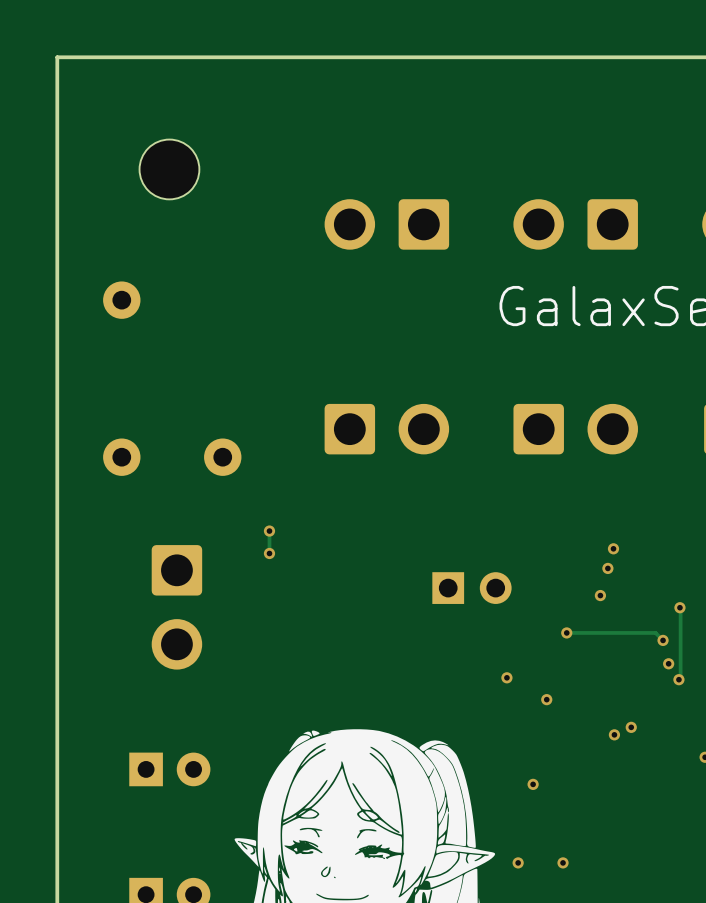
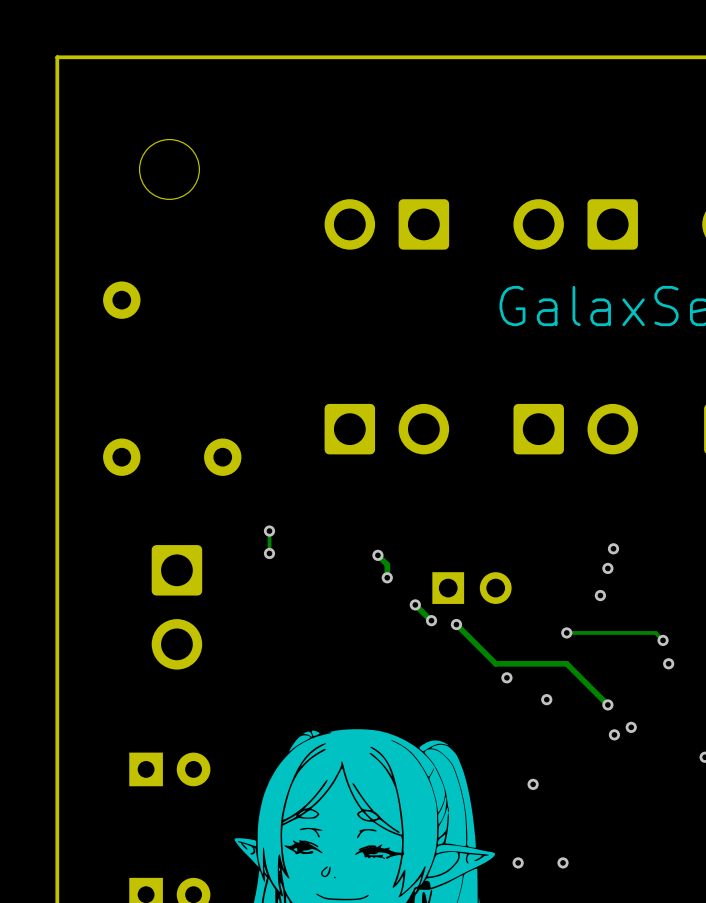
track: none -> (377, 555) (387, 564) (387, 577)
via: none -> (377, 555)
via: none -> (387, 577)
track: none -> (415, 604) (431, 620)
via: none -> (415, 604)
track: (679, 607) (680, 677) (678, 679) -> none
via: (679, 607) -> none
via: none -> (431, 620)
track: none -> (456, 624) (495, 663) (566, 663) (607, 704)
via: none -> (456, 624)
via: (678, 679) -> none
via: none -> (607, 704)

